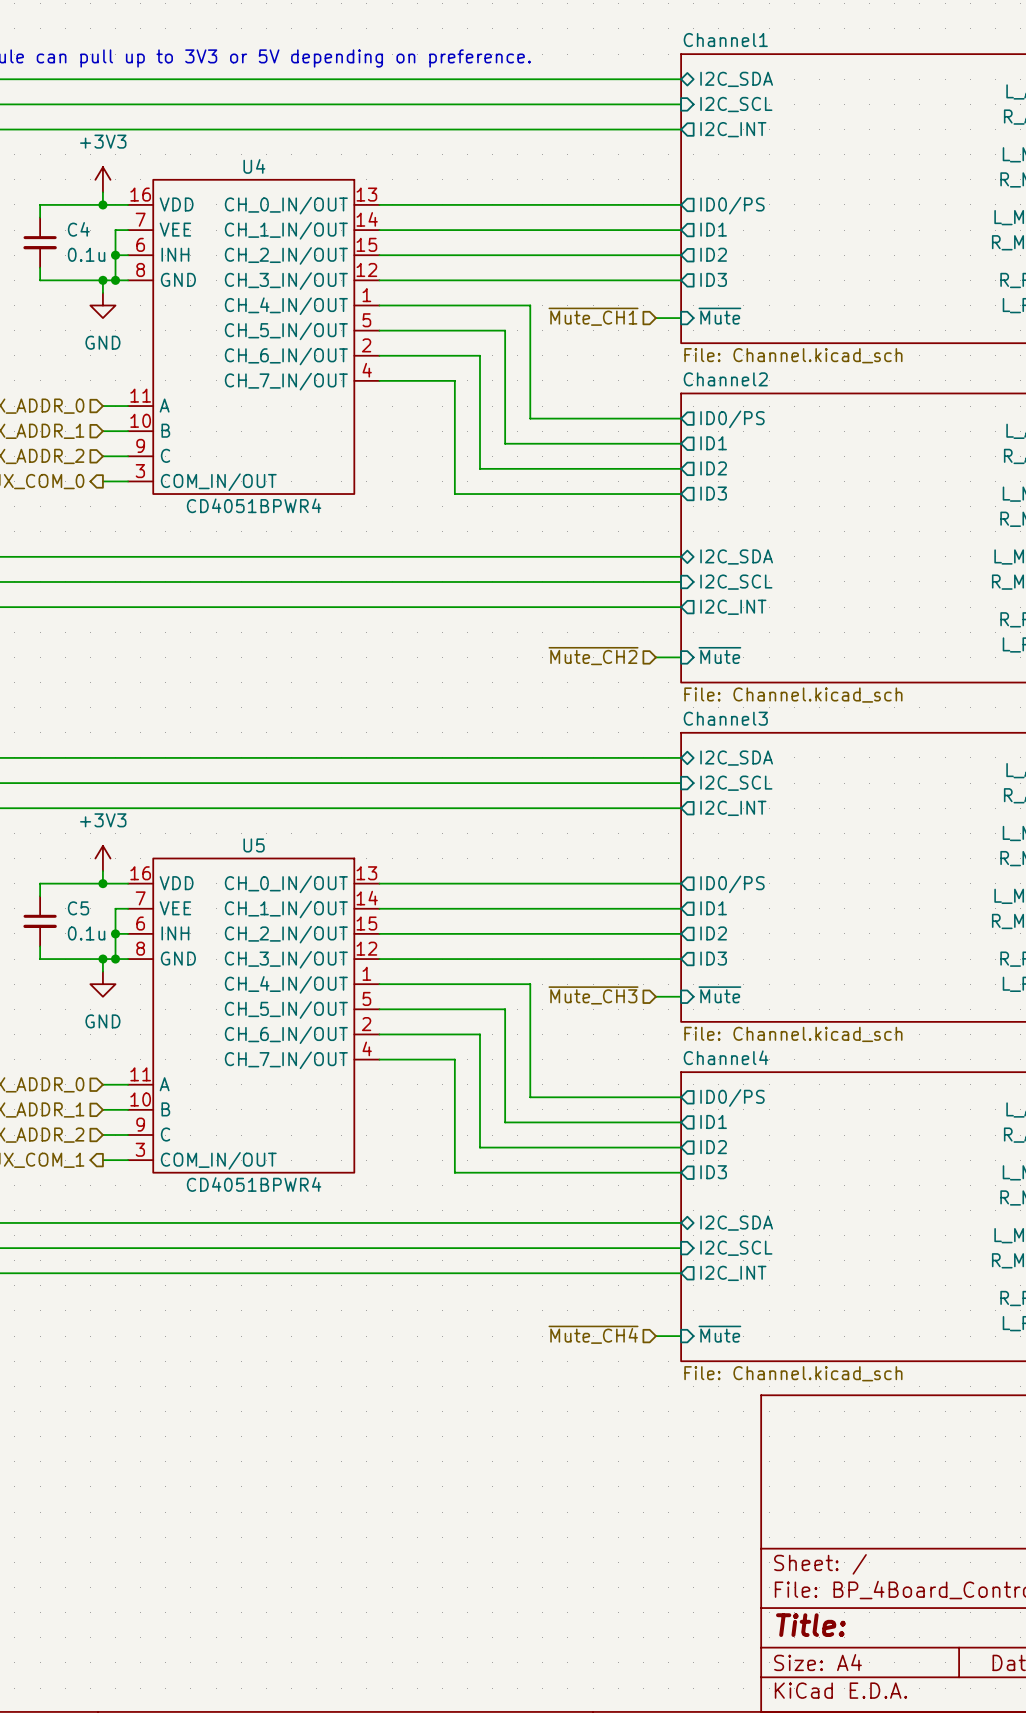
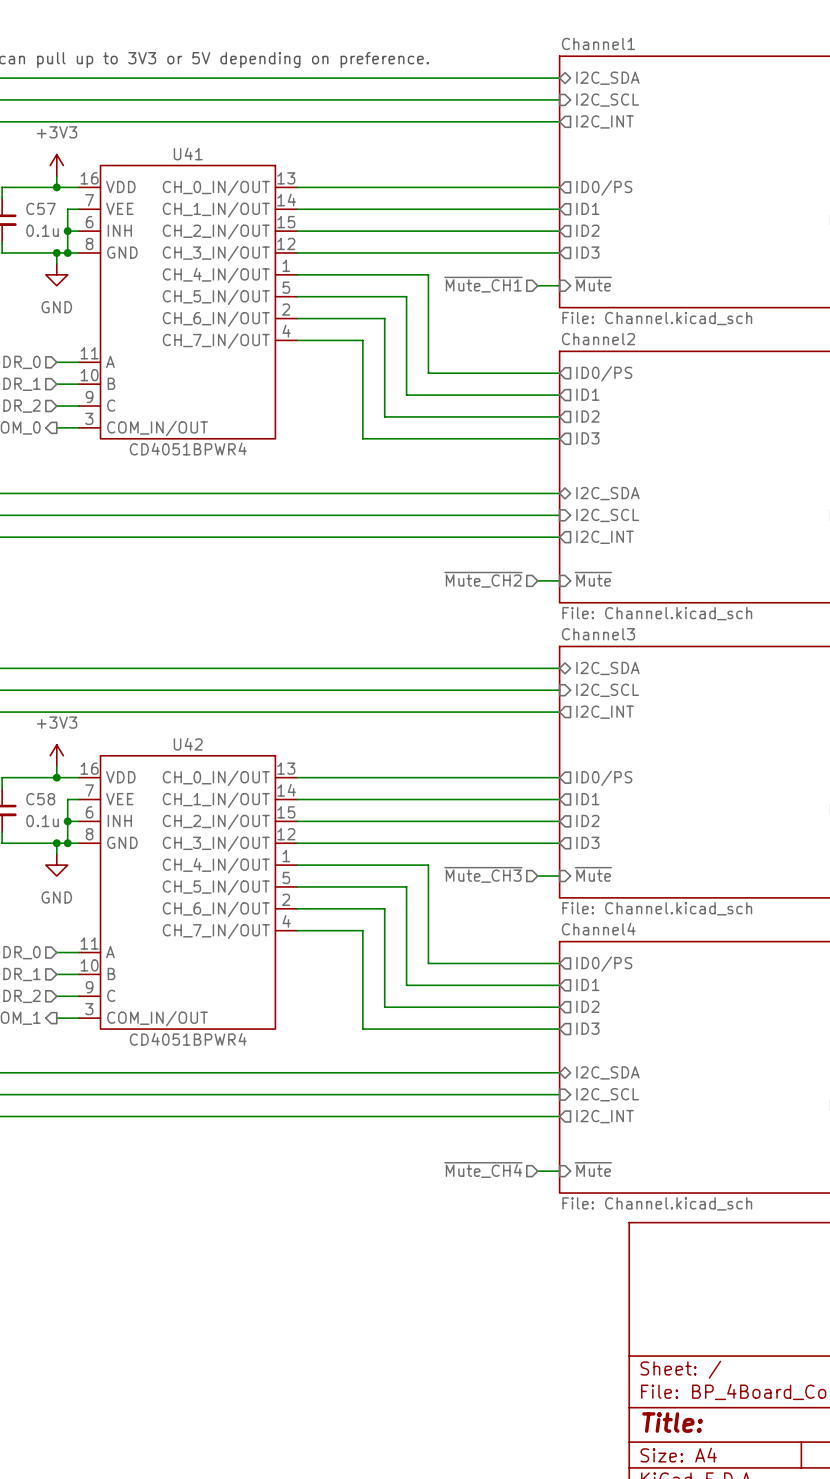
U4 name: U4 (254, 166) -> U41 (188, 153)
C4 name: C4 (78, 229) -> C57 (41, 208)
U5 name: U5 (254, 845) -> U42 (188, 744)
C5 name: C5 (78, 908) -> C58 (40, 799)

